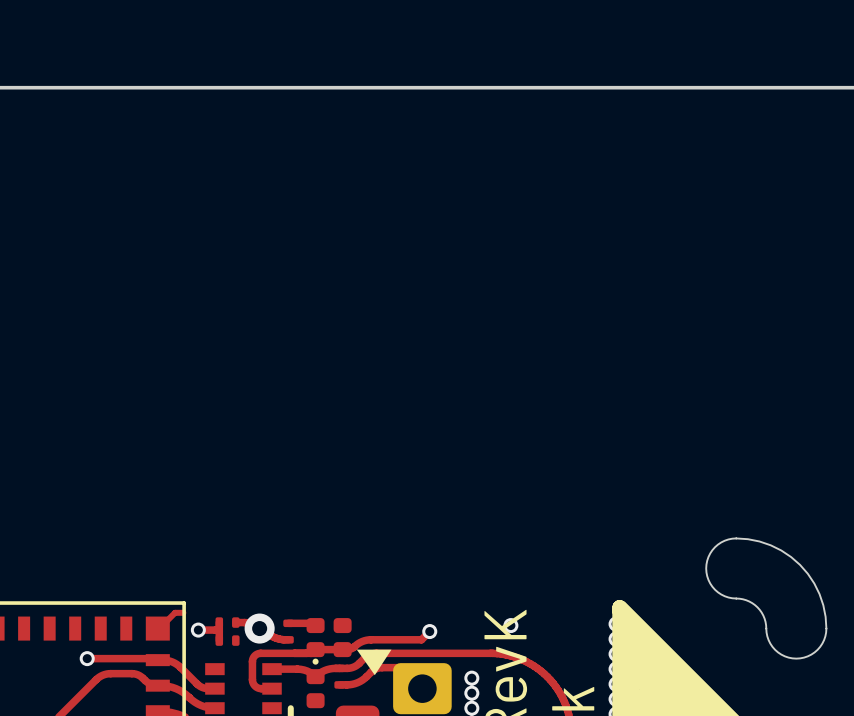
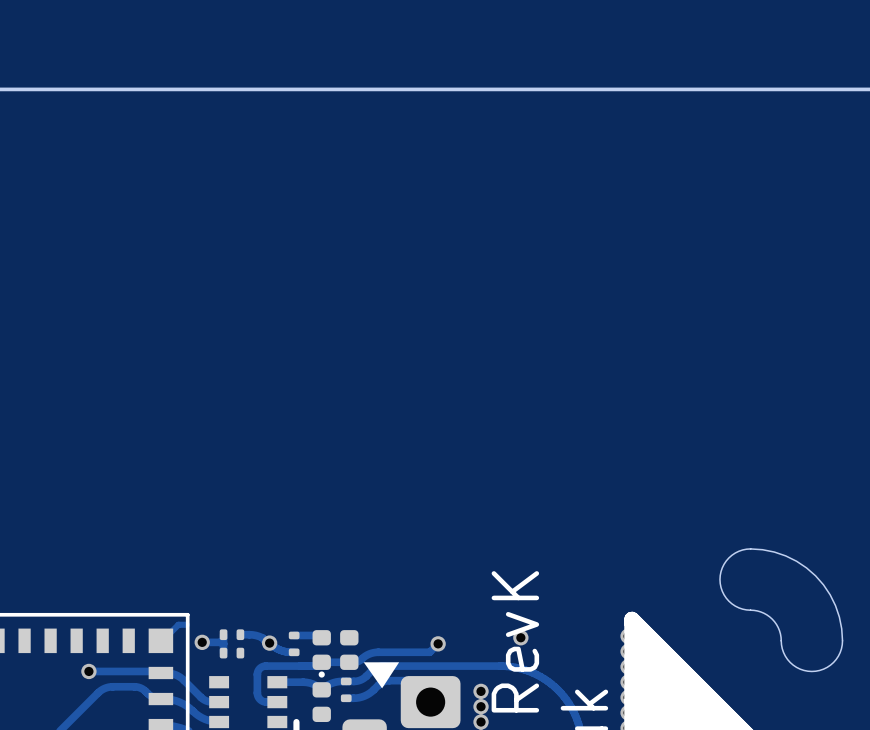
via size: [244, 613, 275, 644] -> [261, 635, 278, 651]

